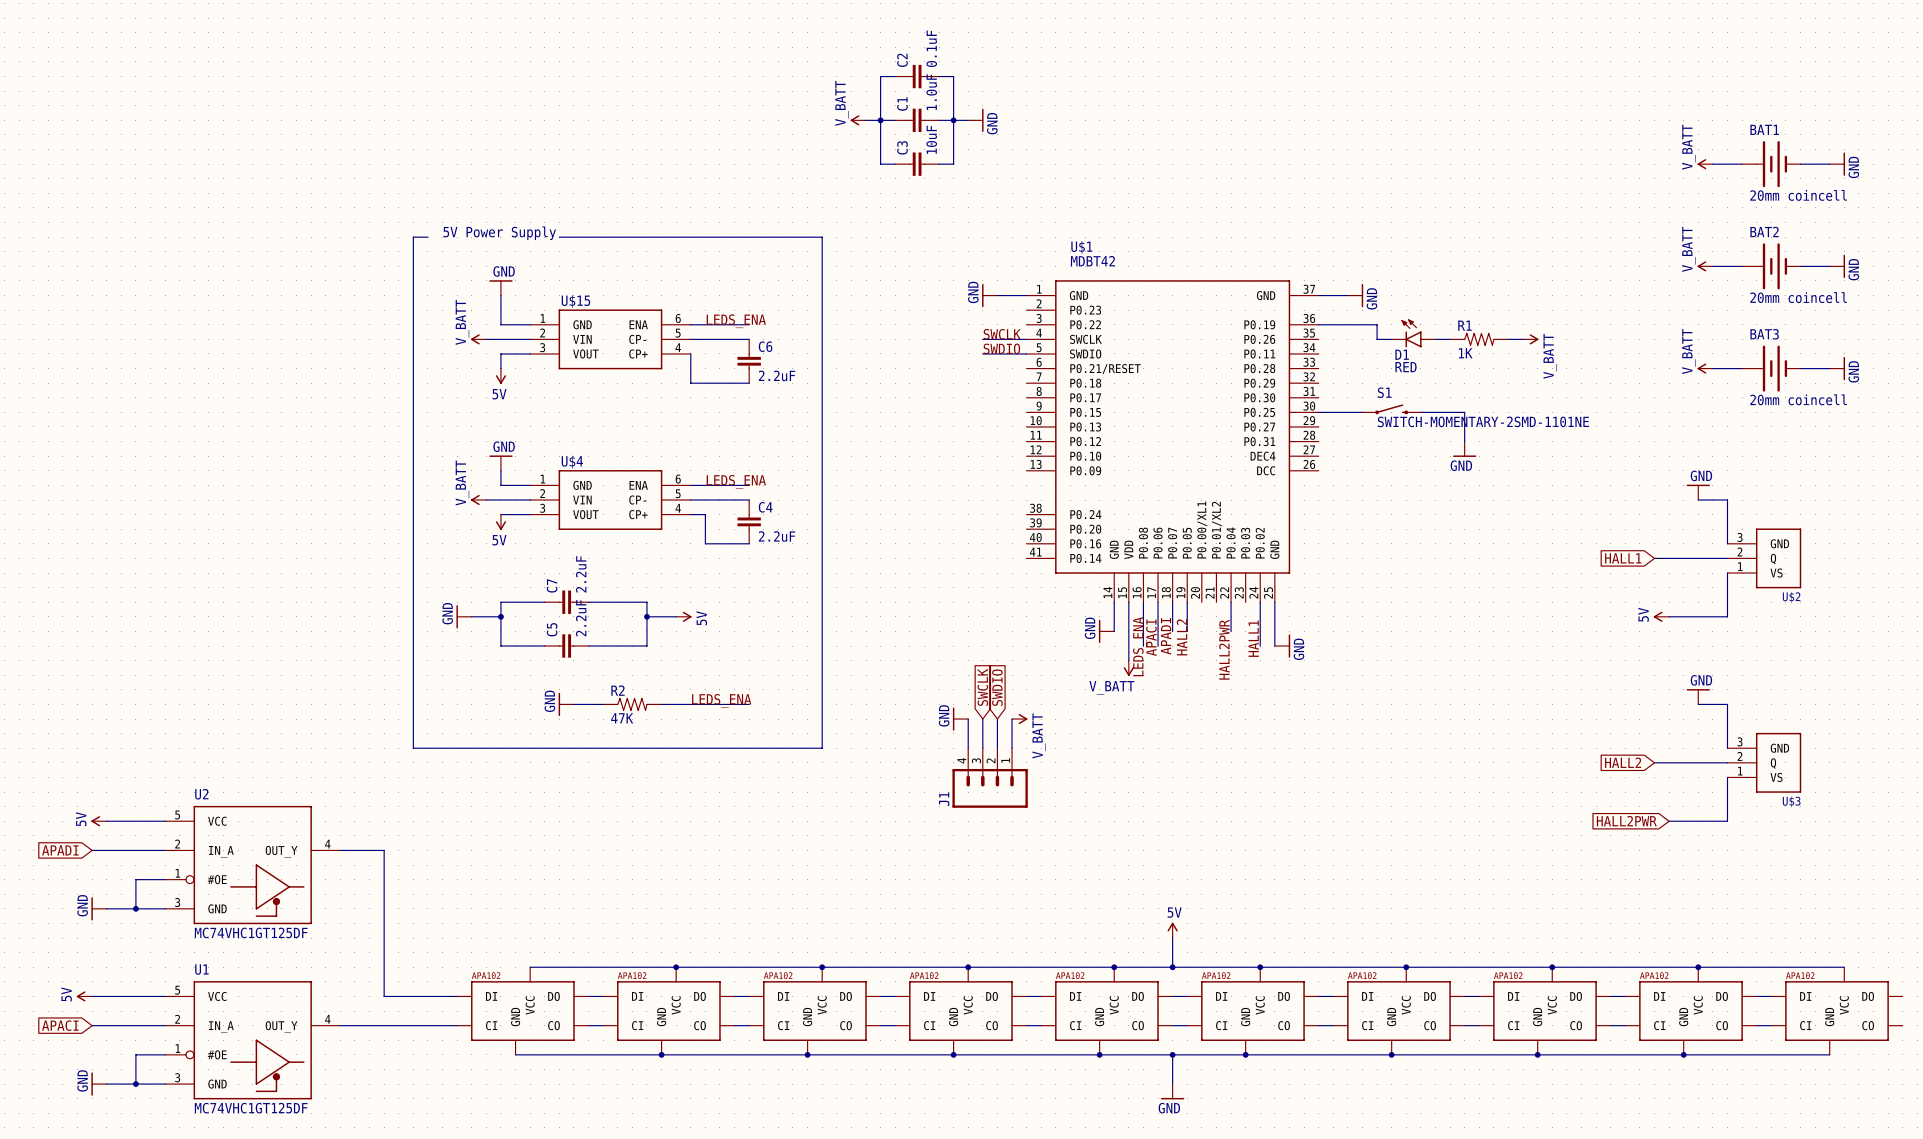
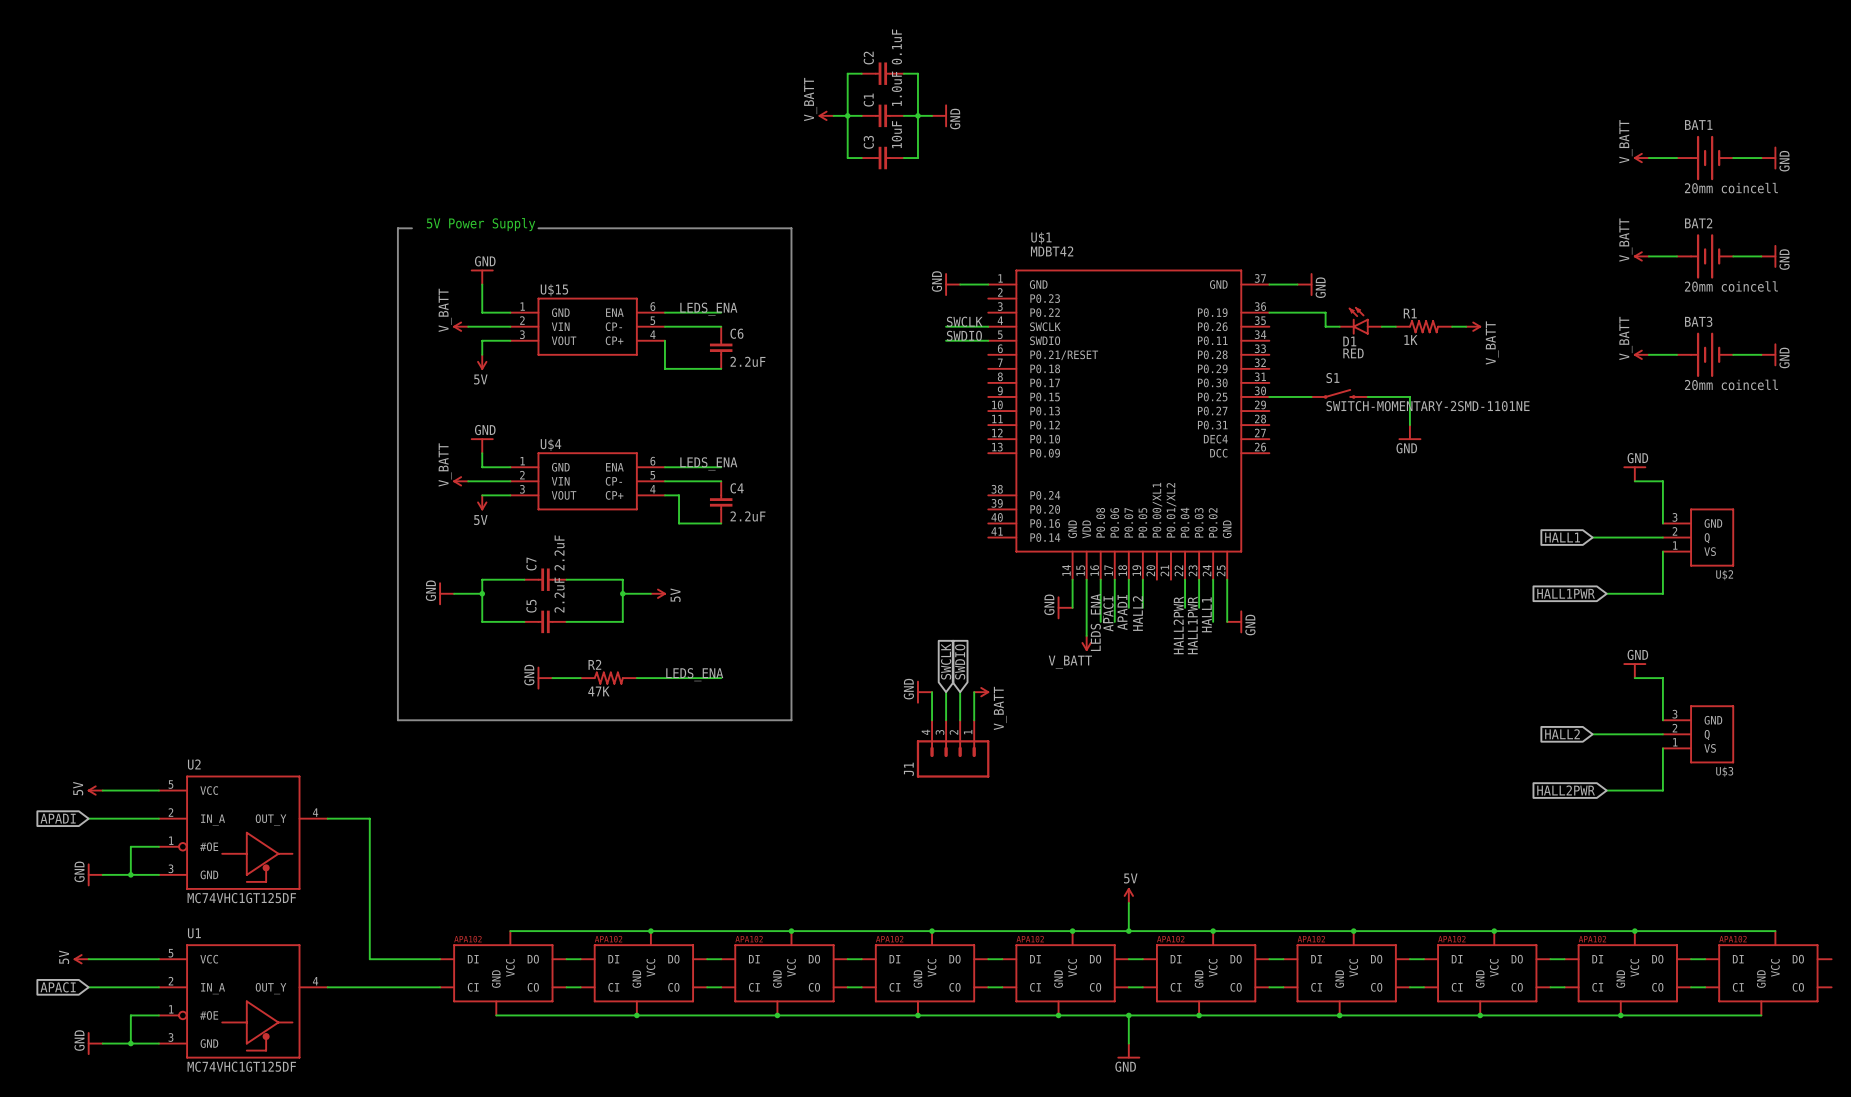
wire: none -> (1199, 579) (1199, 607)
global label: none -> HALL1PWR (1566, 593)
power symbol: 5V (1661, 616) -> none
label: none -> HALL1PWR (1192, 625)

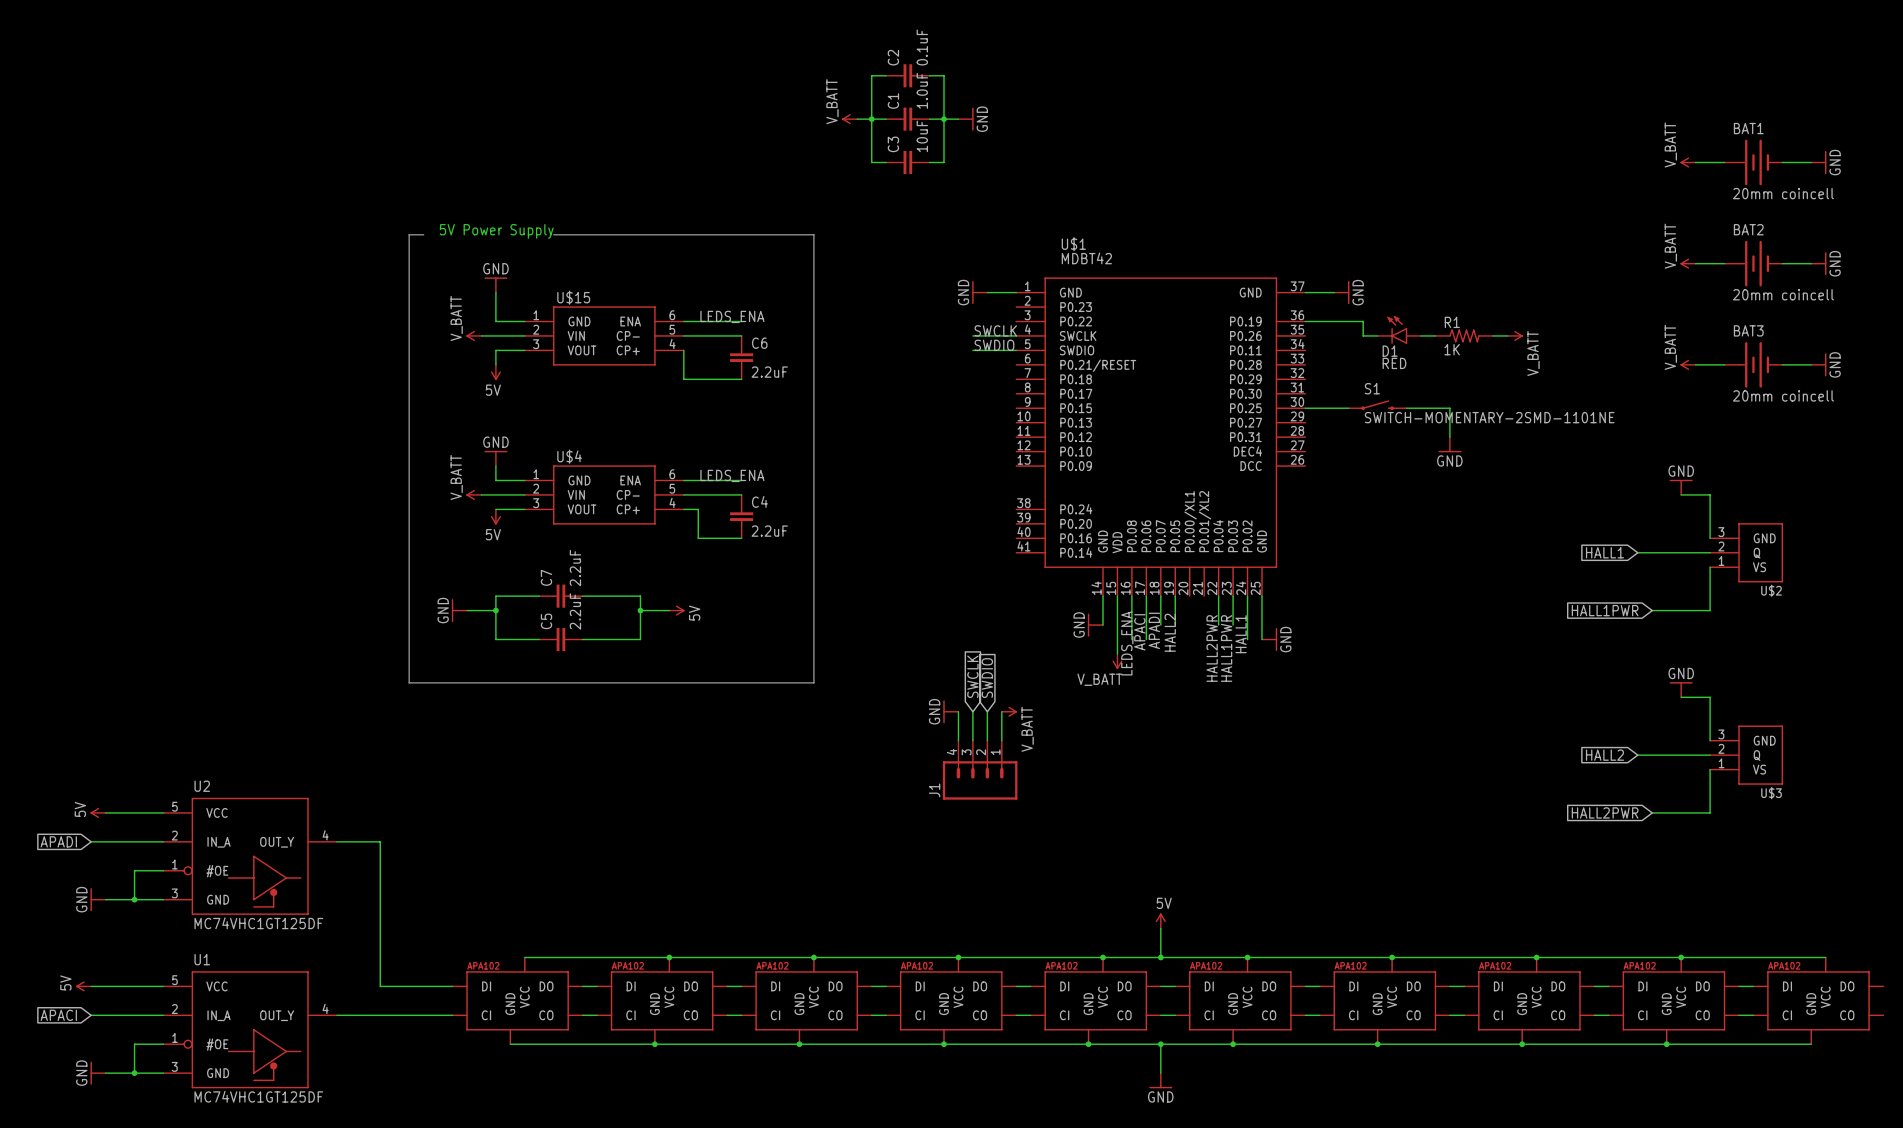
line: (397, 664) (397, 720) (791, 720) (791, 664) -> (409, 682) (813, 682)
label: LEDS_ENA (694, 674) -> none
power symbol: GND (545, 678) -> none
wire: (552, 678) (580, 678) -> none
R2: 47K (608, 678) -> none
wire: (636, 678) (721, 678) -> none

